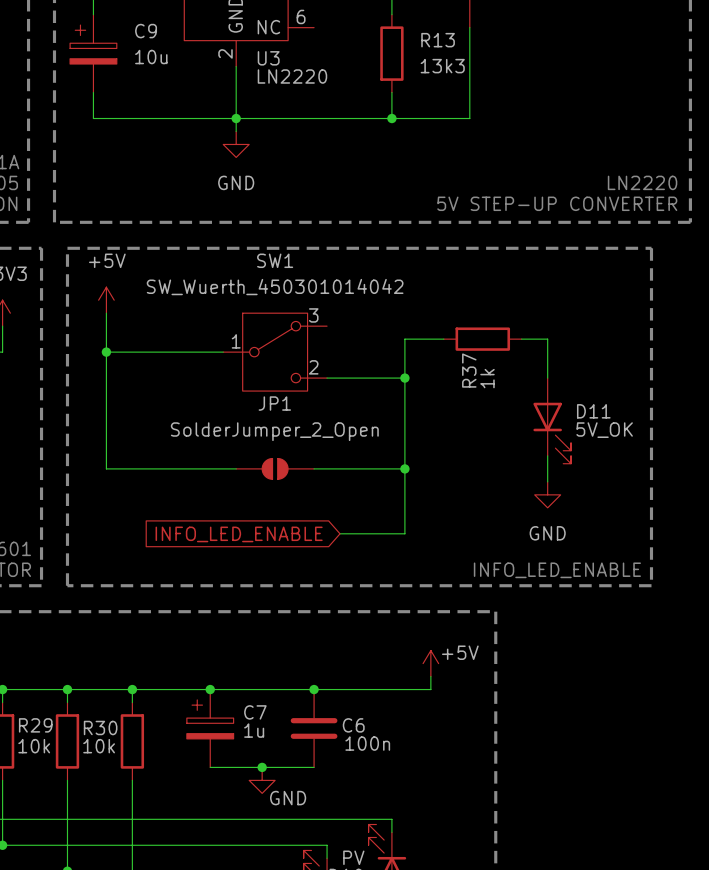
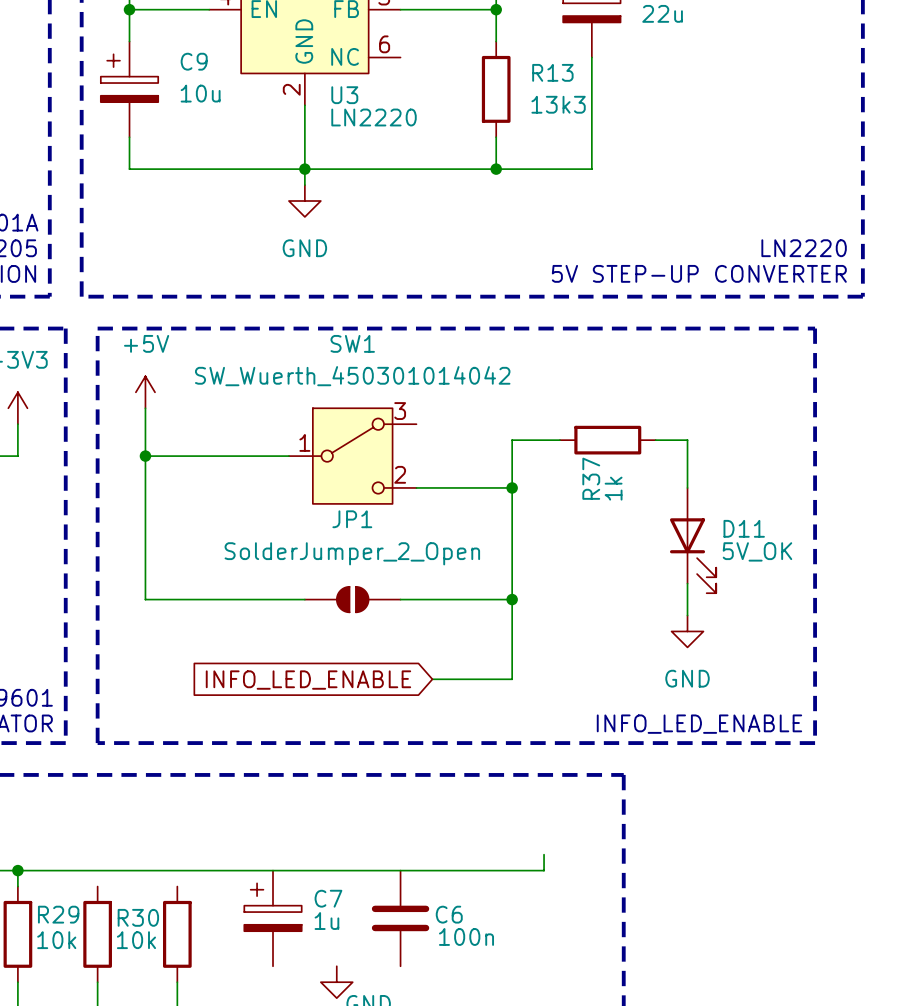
power symbol: +5V (430, 663) -> none
wire: (67, 689) (67, 702) -> none
junction: (67, 689) -> none
wire: (132, 689) (132, 702) -> none
junction: (132, 689) -> none
junction: (210, 689) -> none
junction: (314, 689) -> none
wire: (210, 767) (314, 767) -> none
junction: (262, 767) -> none

